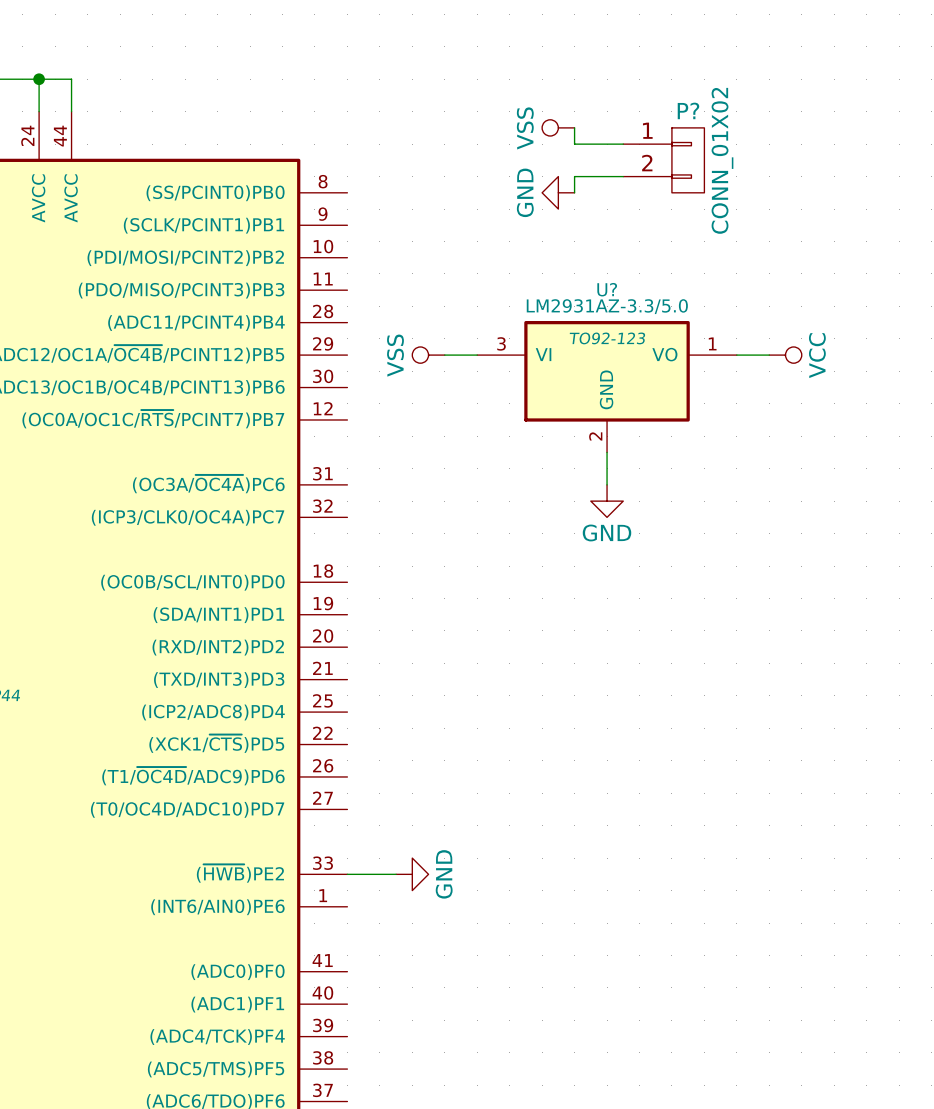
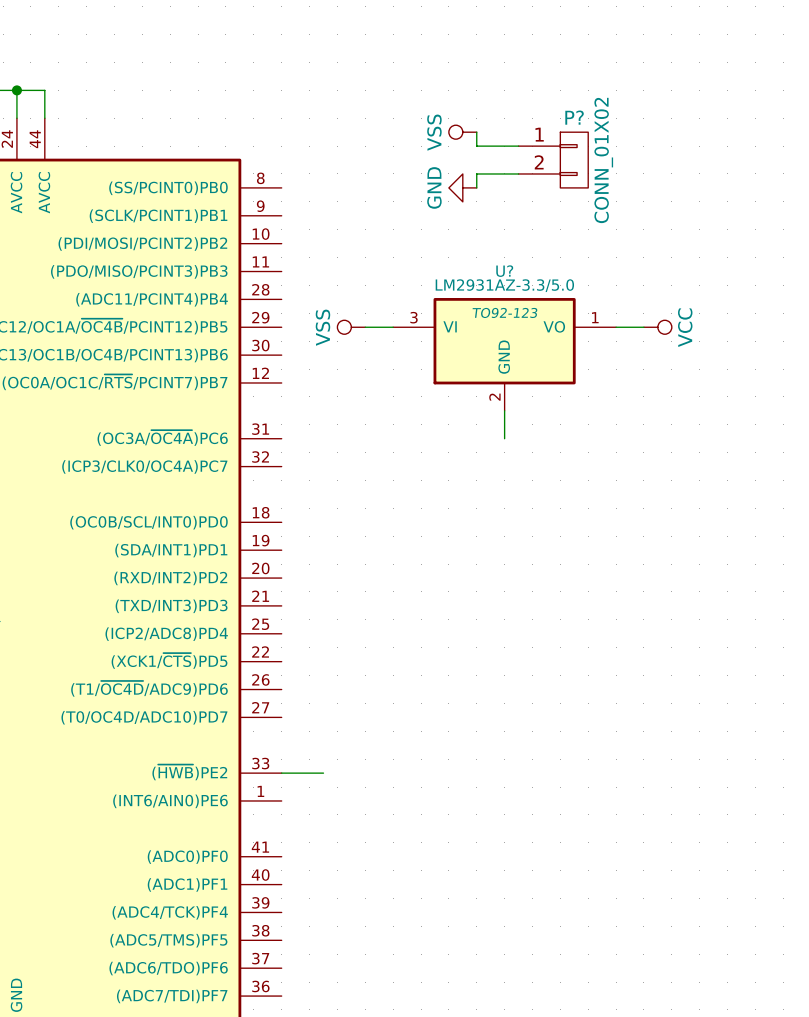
power symbol: GND (607, 501) -> none
power symbol: GND (412, 874) -> none

